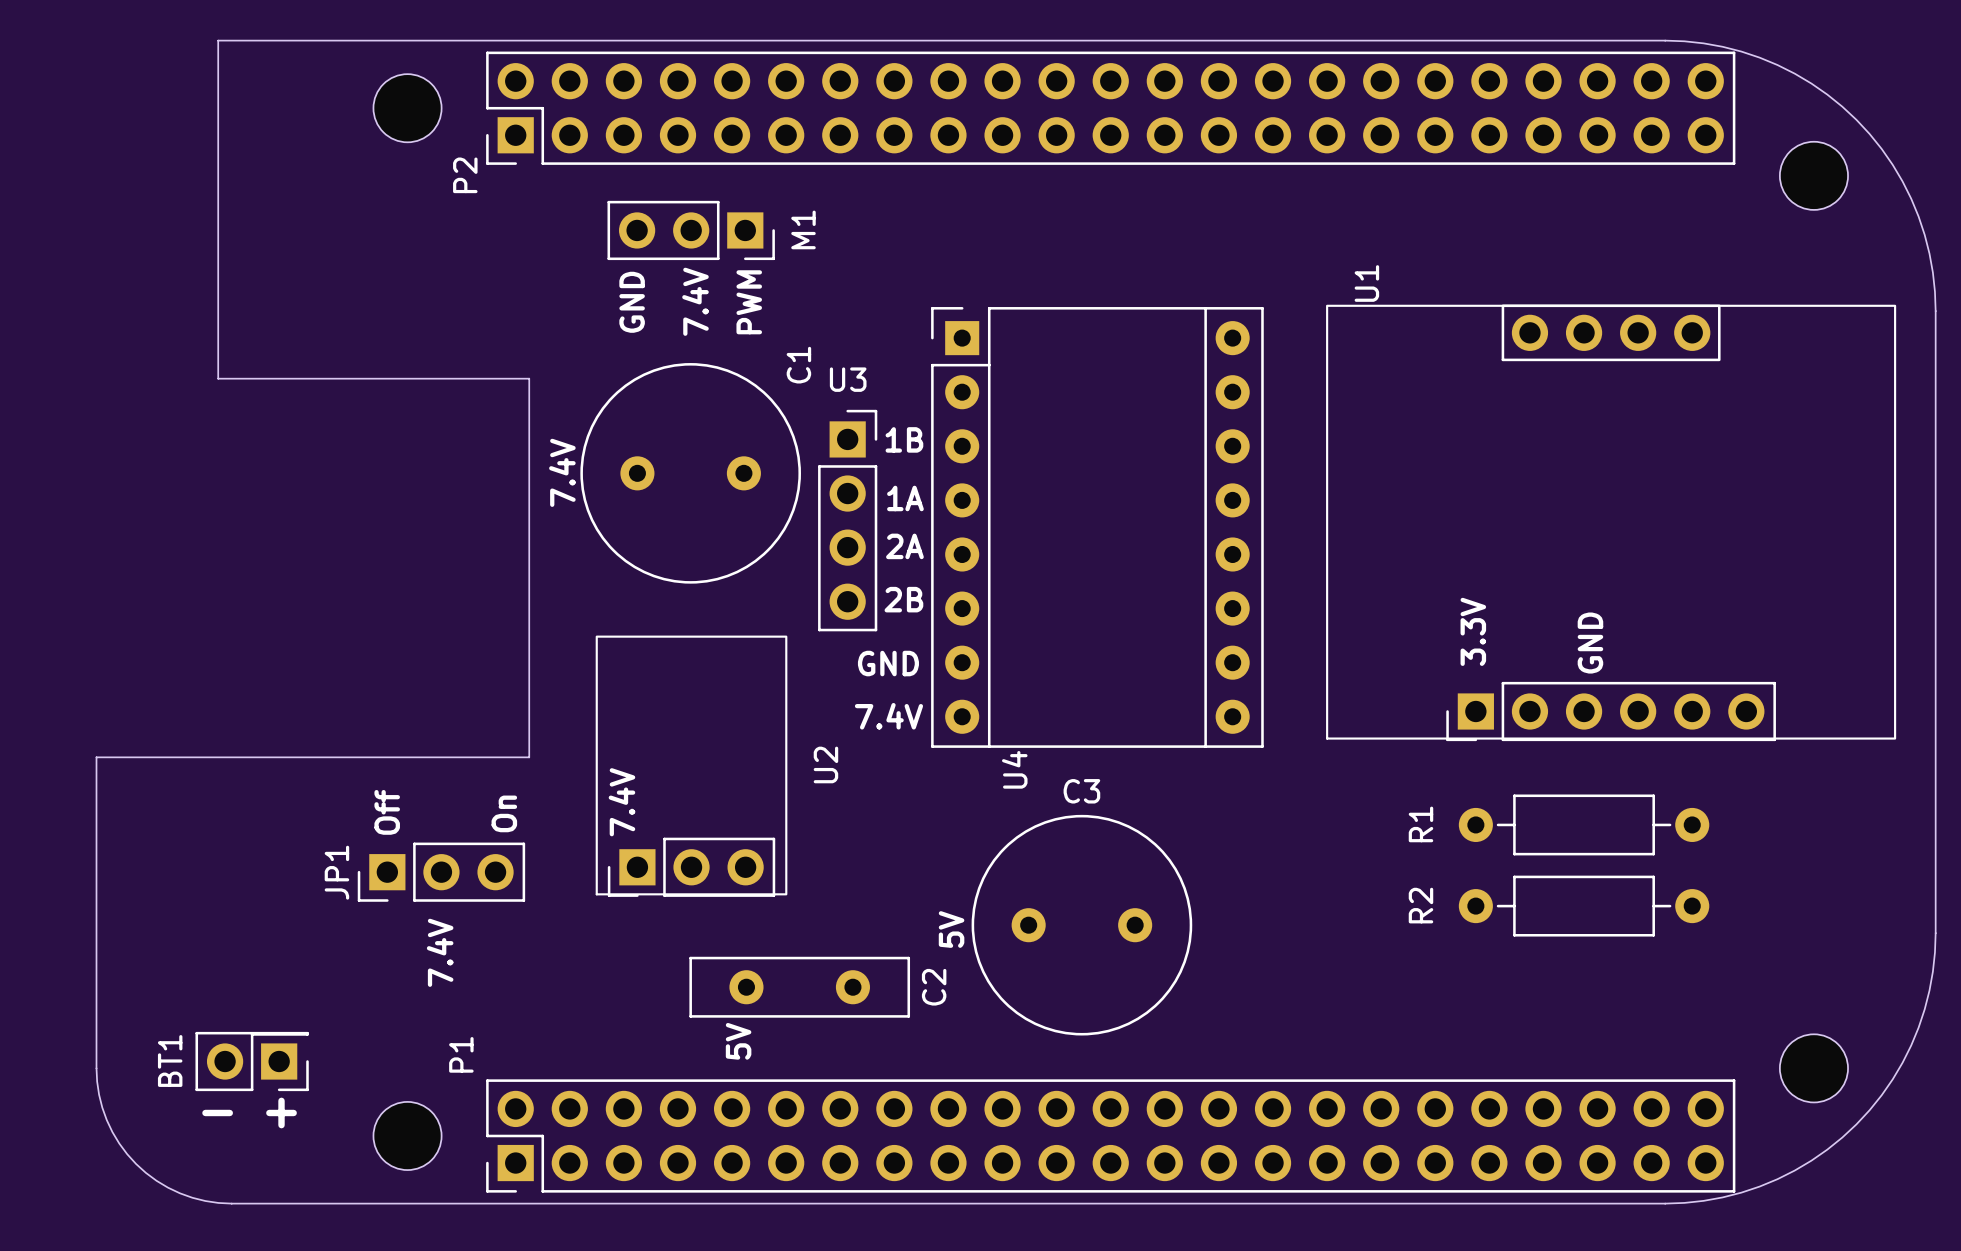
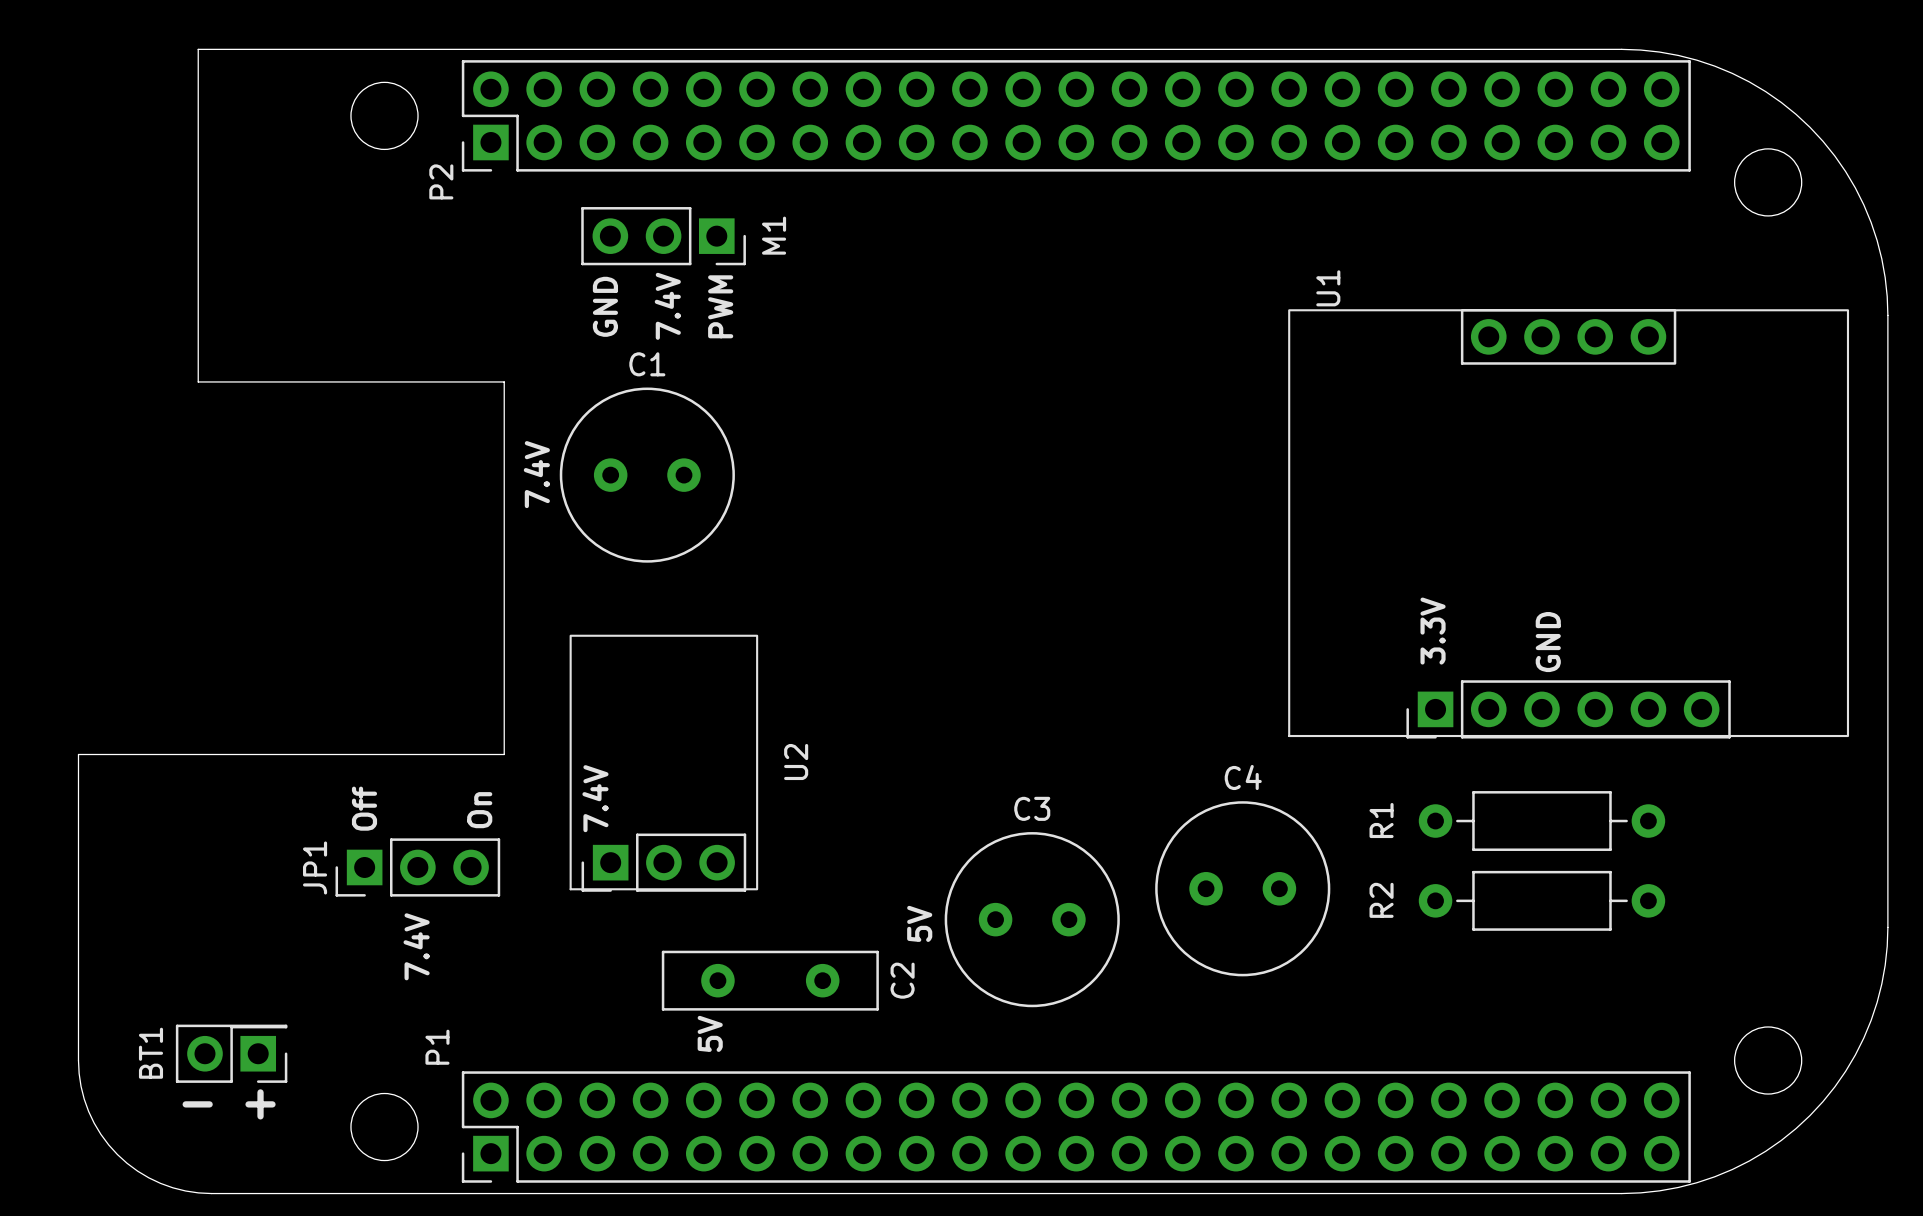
C1 footprint: [580, 363, 801, 584] -> [559, 387, 735, 563]
C1 name position: C1 (798, 365) -> C1 (647, 364)
text: 1B (904, 439) -> none
text: 1A (905, 498) -> none
U3: (847, 520) -> none
U4: (1097, 527) -> none
text: 2A (904, 546) -> none
text: 2B (903, 599) -> none
text: GND (888, 663) -> none
text: 7.4V (888, 716) -> none
C3 footprint: [971, 814, 1193, 1036] -> [944, 832, 1120, 1008]
C4: none -> (1242, 888)

